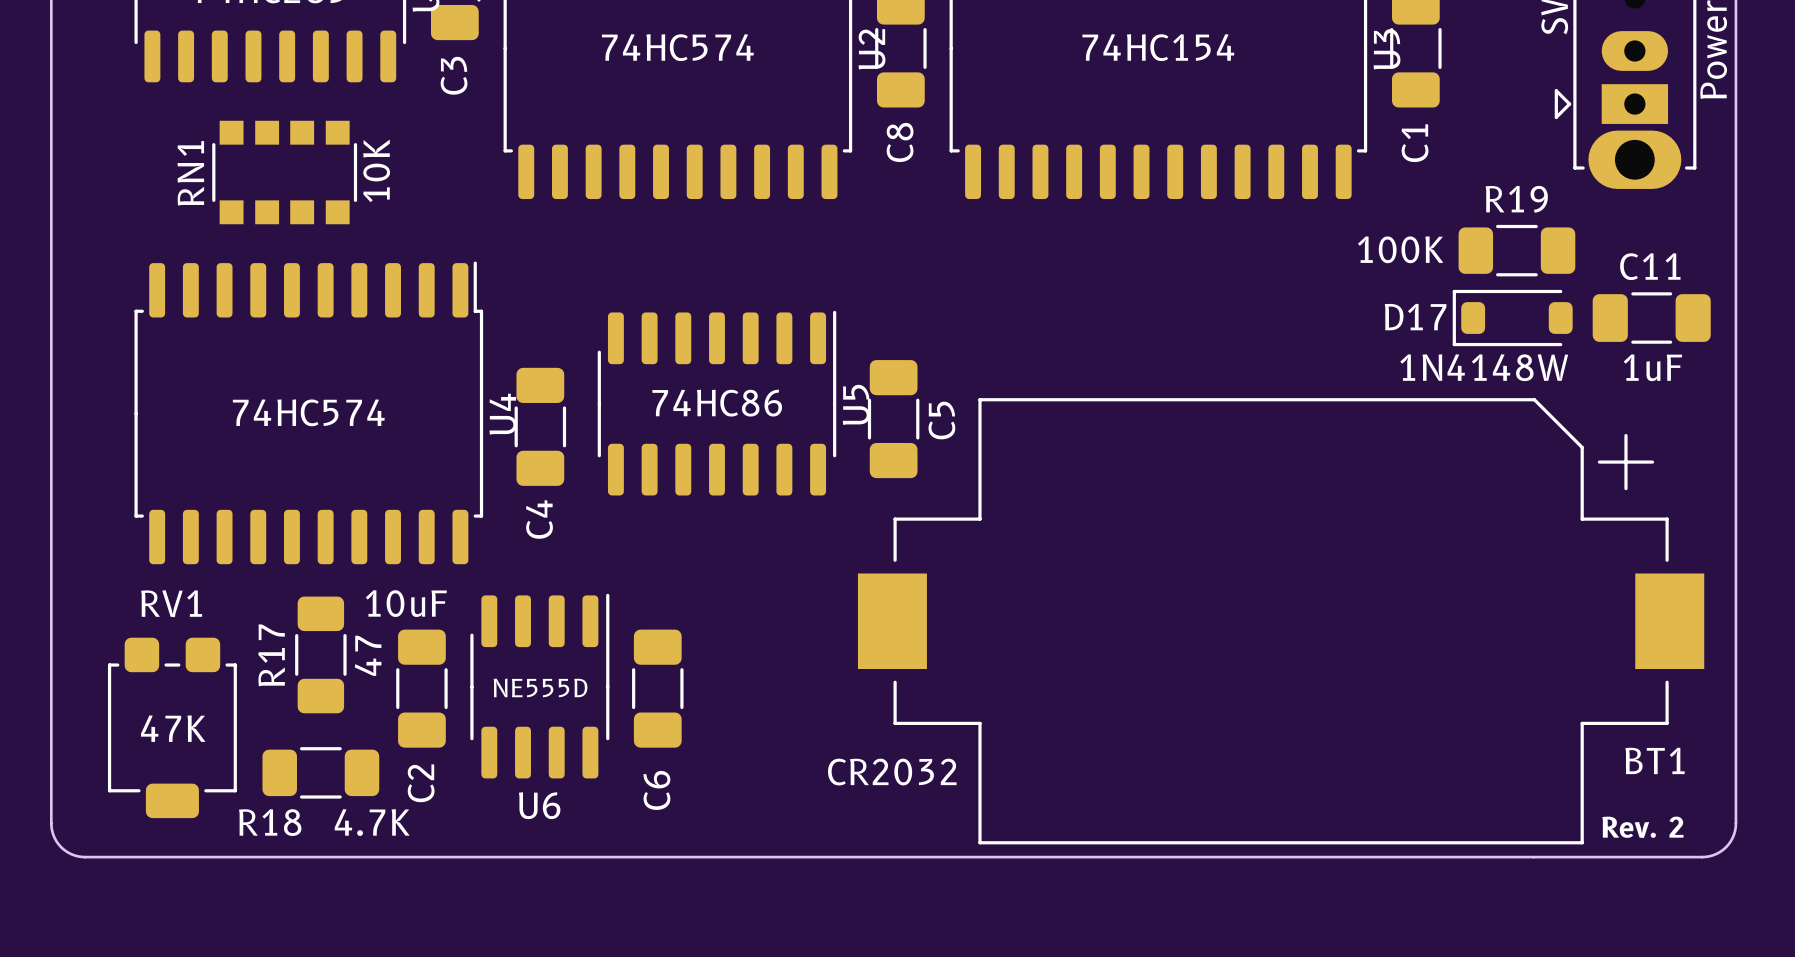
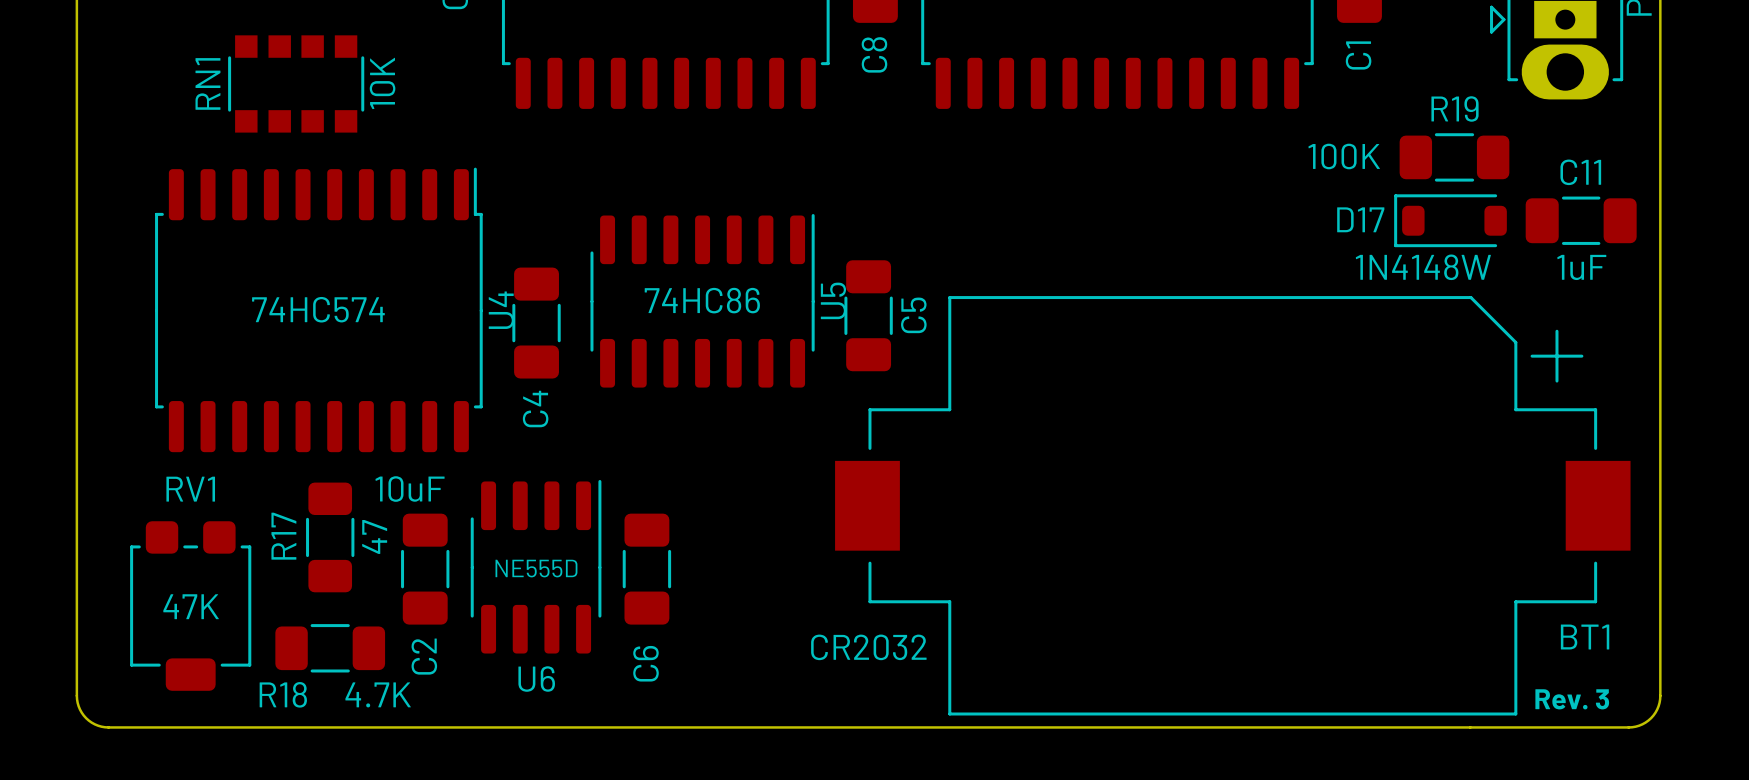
text: Rev. 2 (1642, 827) -> Rev. 3 (1572, 699)

